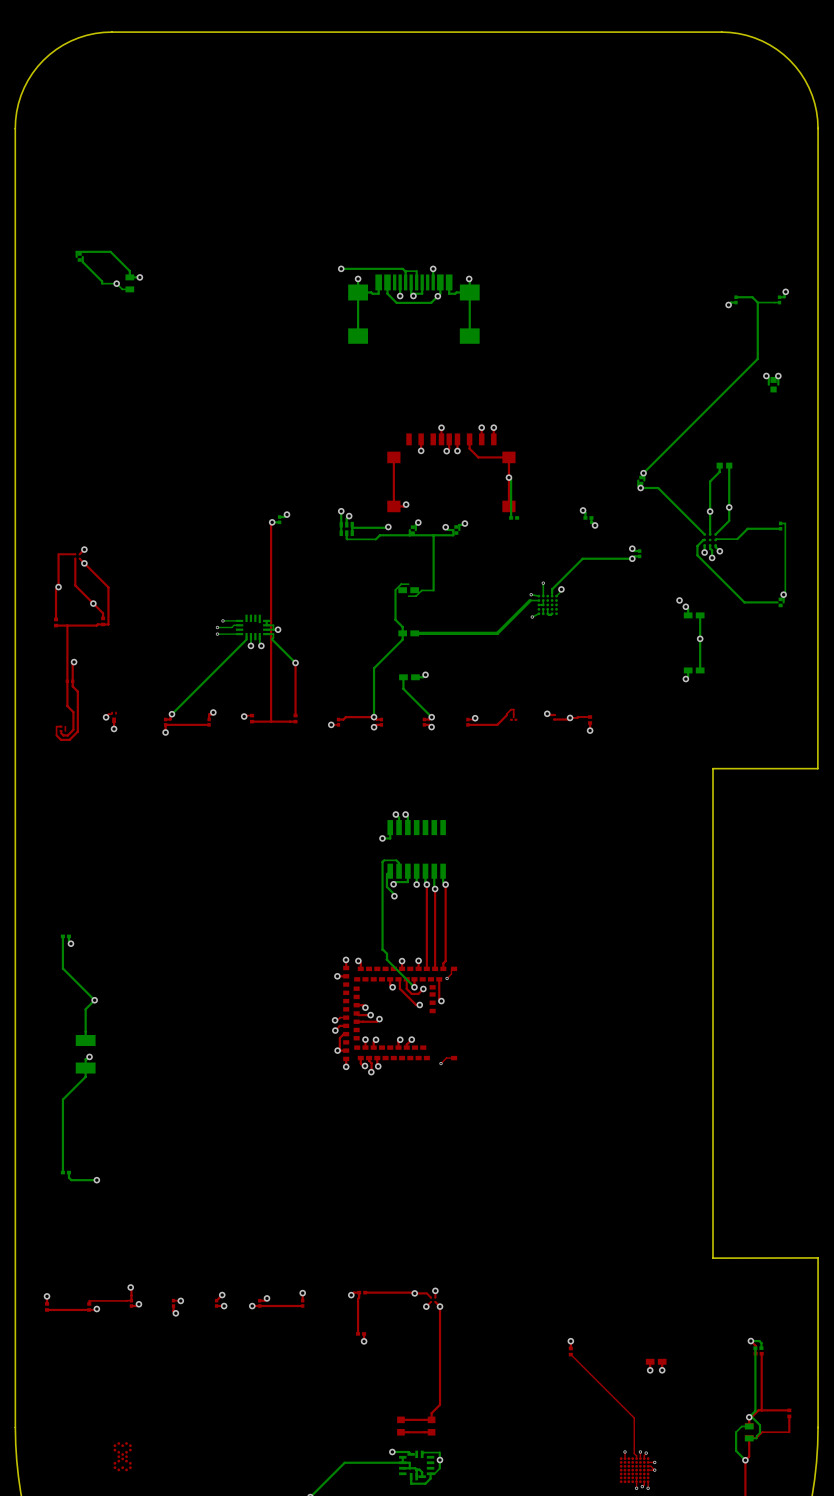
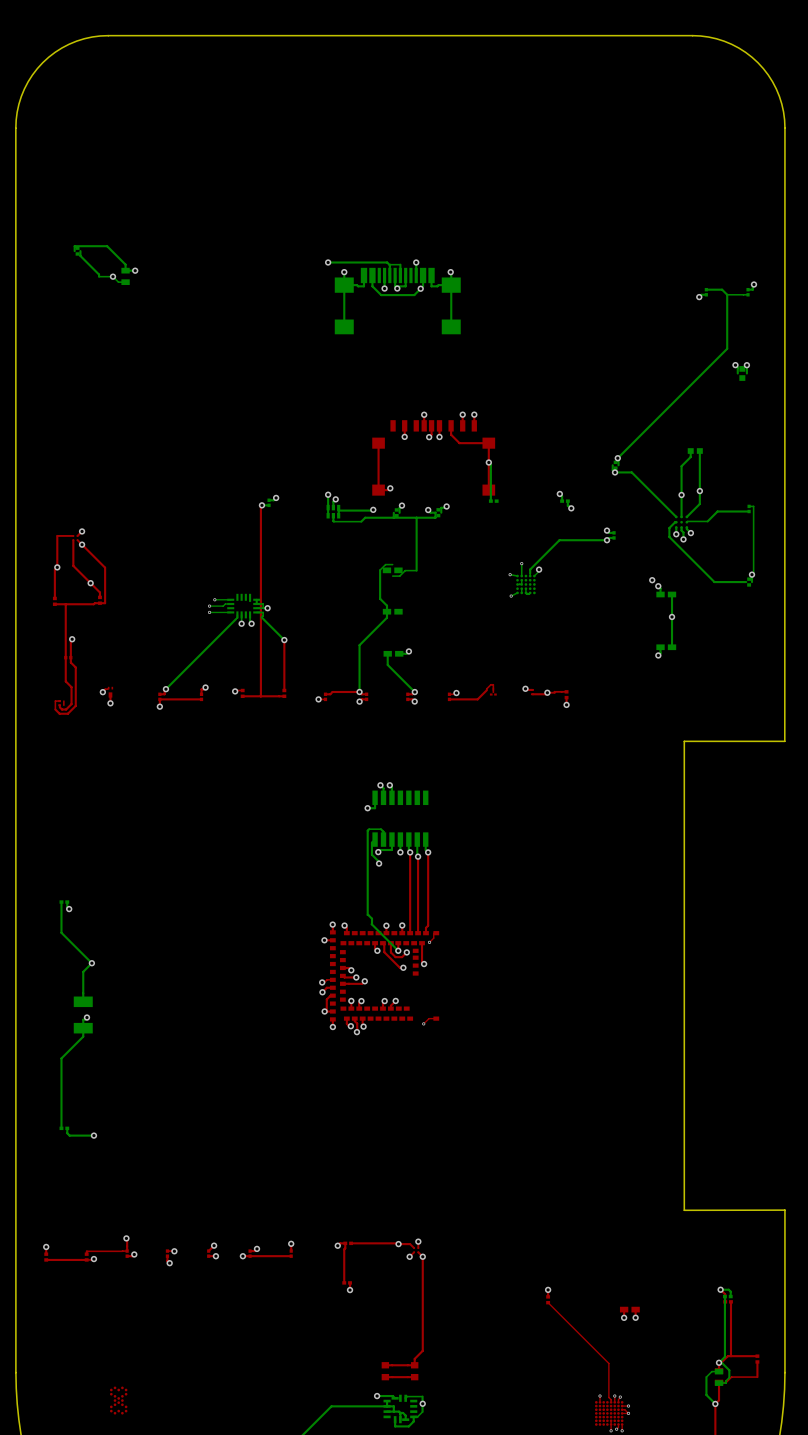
bottom track: (538, 600) (530, 600) (497, 633) (414, 633) -> none

